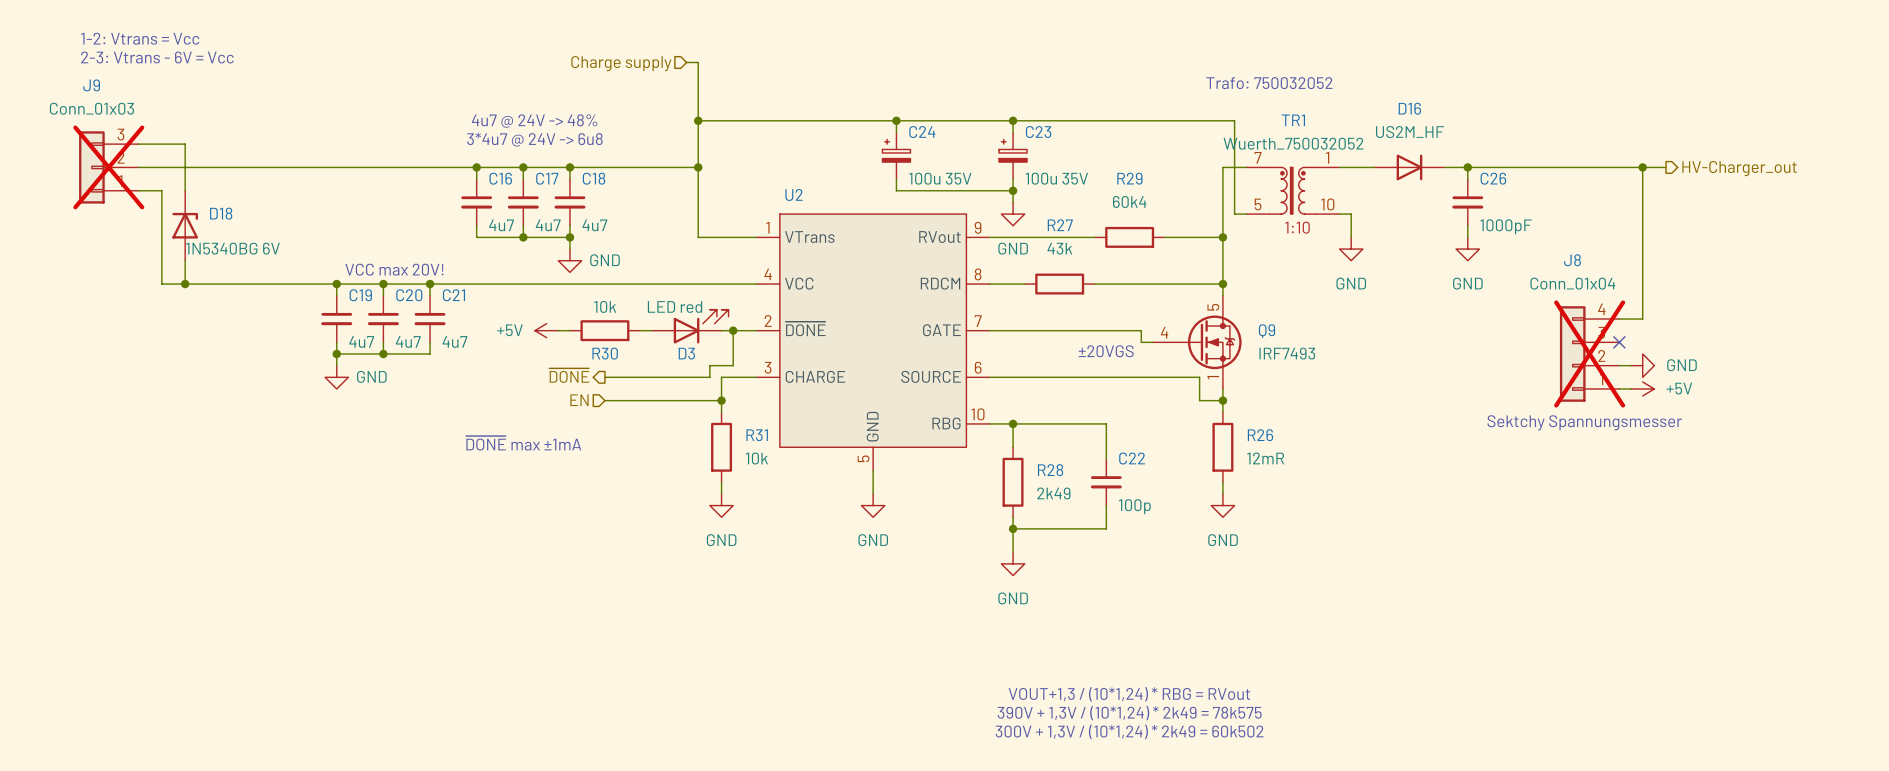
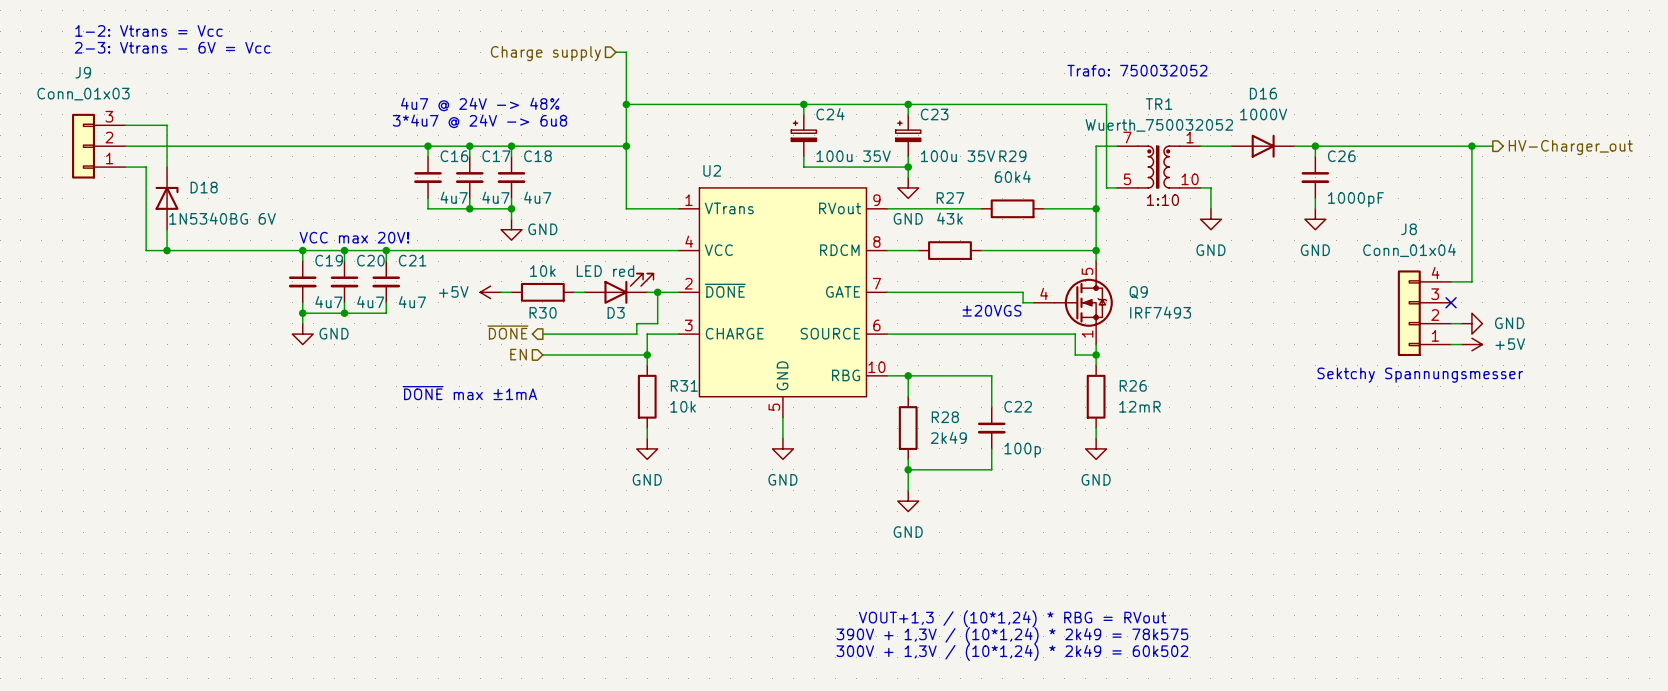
D16 value: US2M_HF (1410, 132) -> 1000V (1263, 114)
J9 do-not-place cross: (108, 167) -> none
J8 do-not-place cross: (1589, 354) -> none

